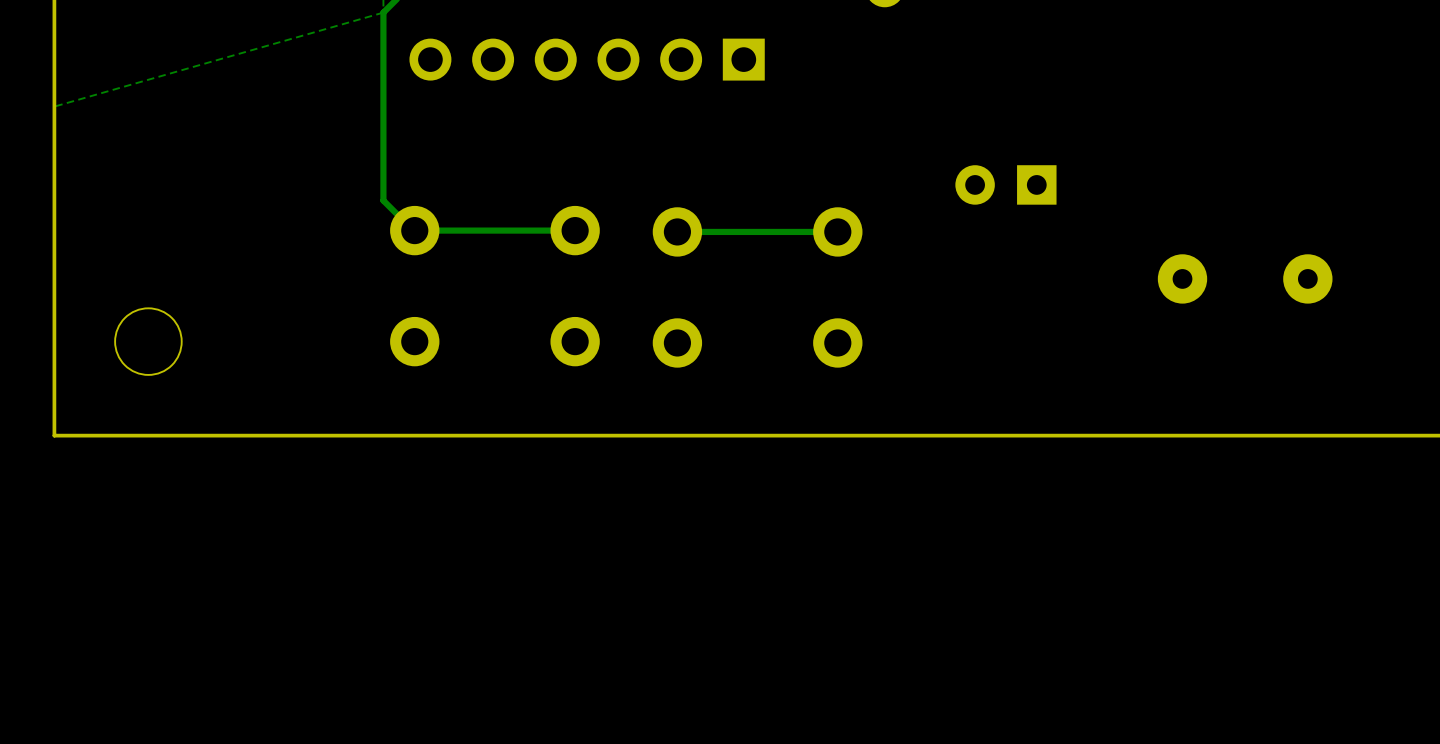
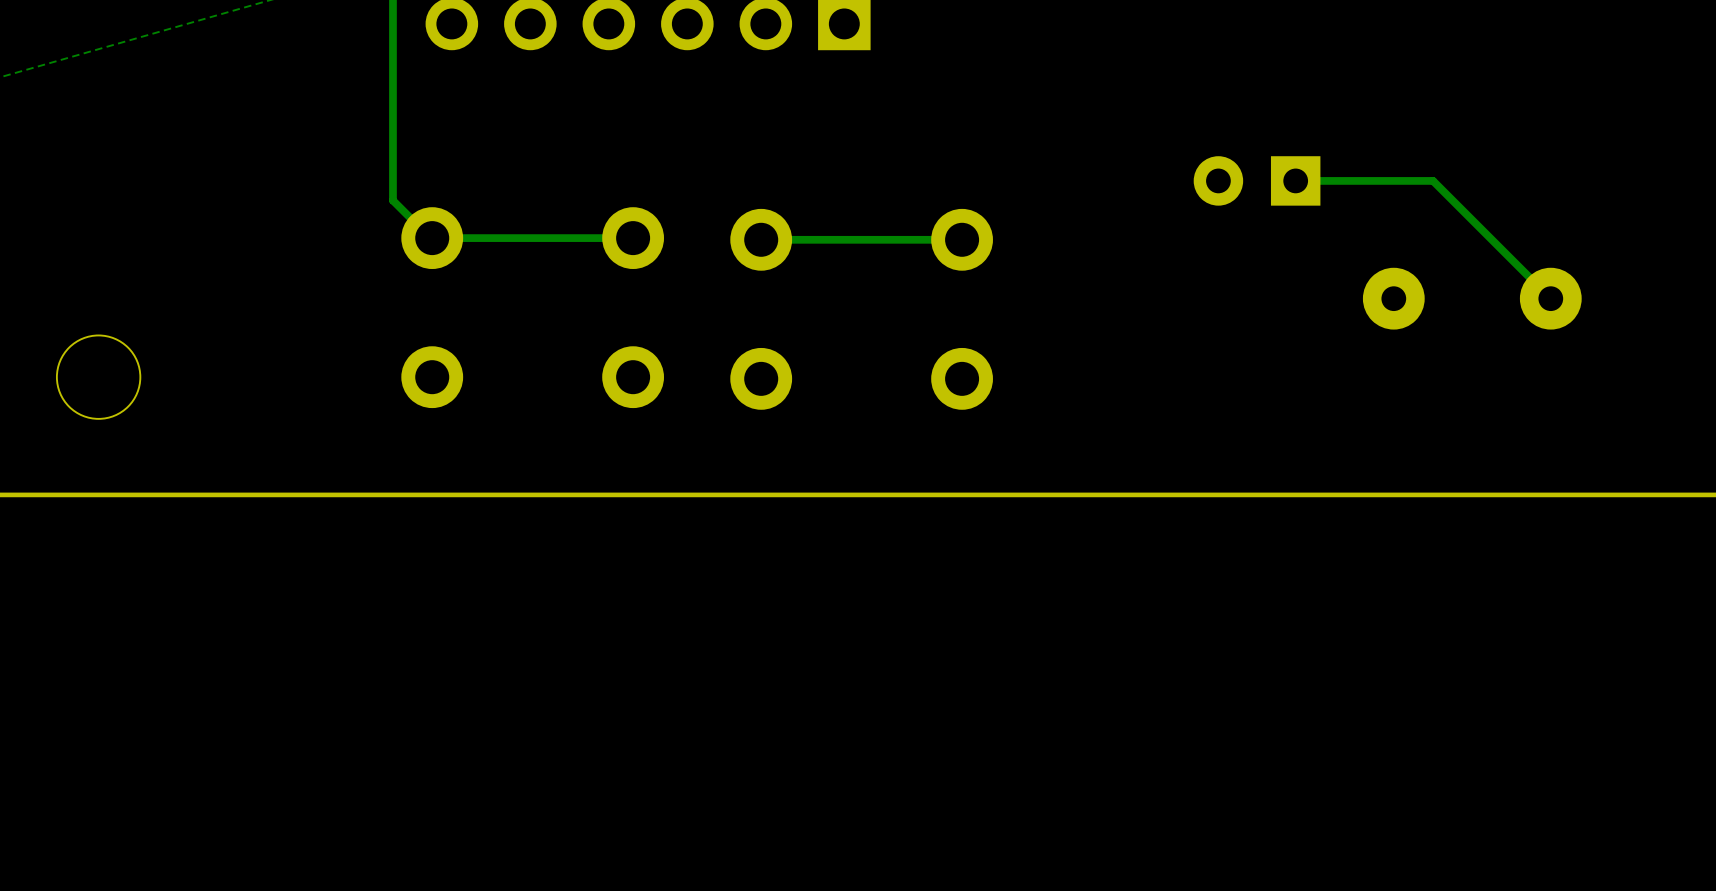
part position: (1005, 184) -> (1257, 180)
track: none -> (1295, 180) (1433, 180) (1550, 298)

